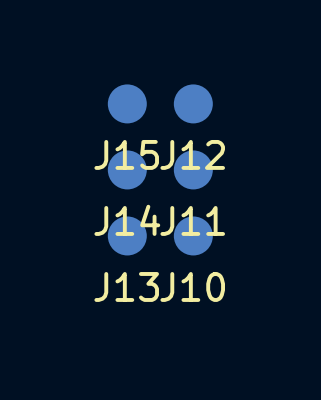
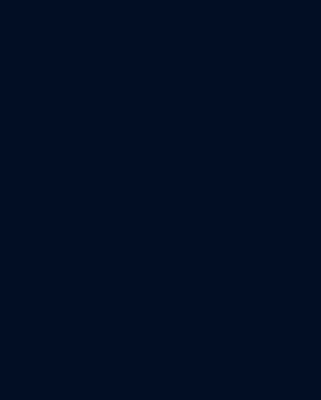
J15: (127, 103) -> none
J12: (193, 103) -> none
J14: (127, 169) -> none
J11: (193, 169) -> none
J13: (127, 235) -> none
J10: (193, 235) -> none

